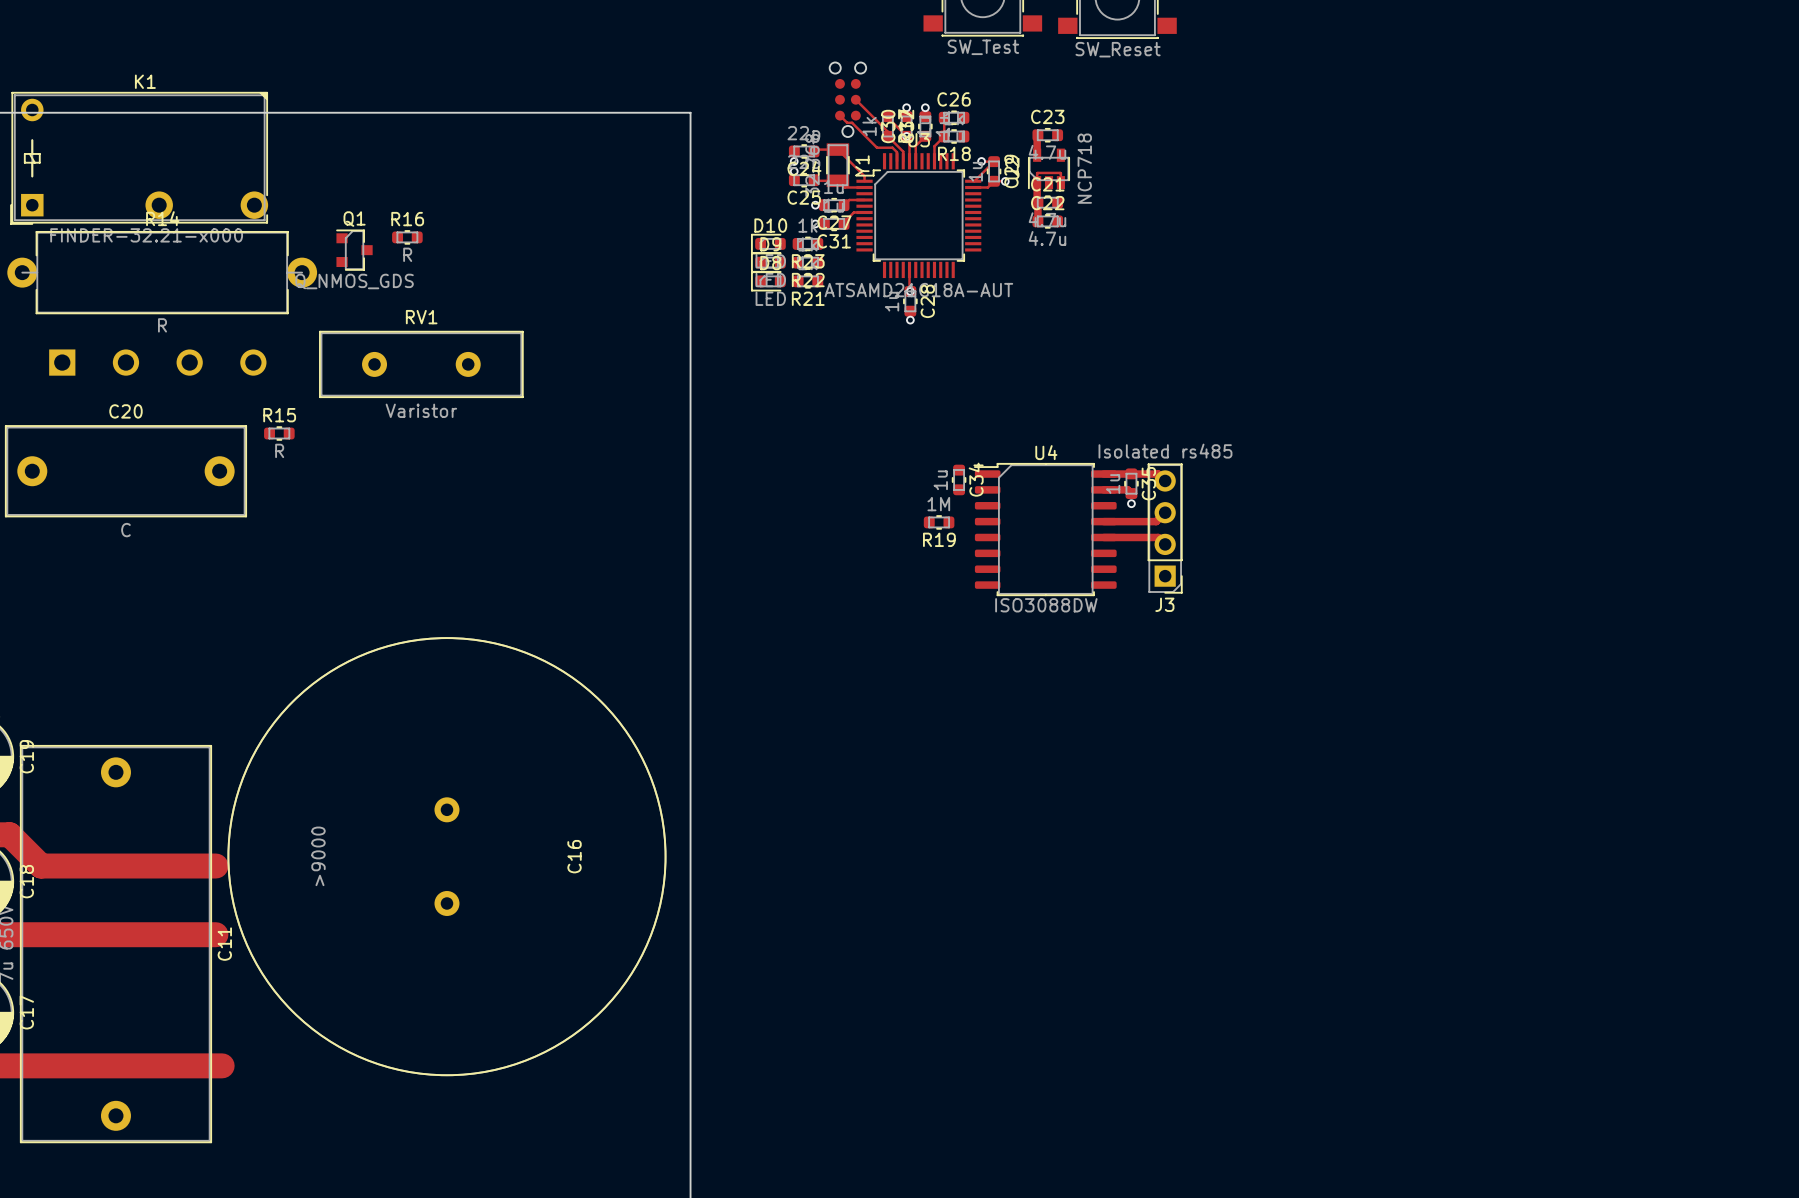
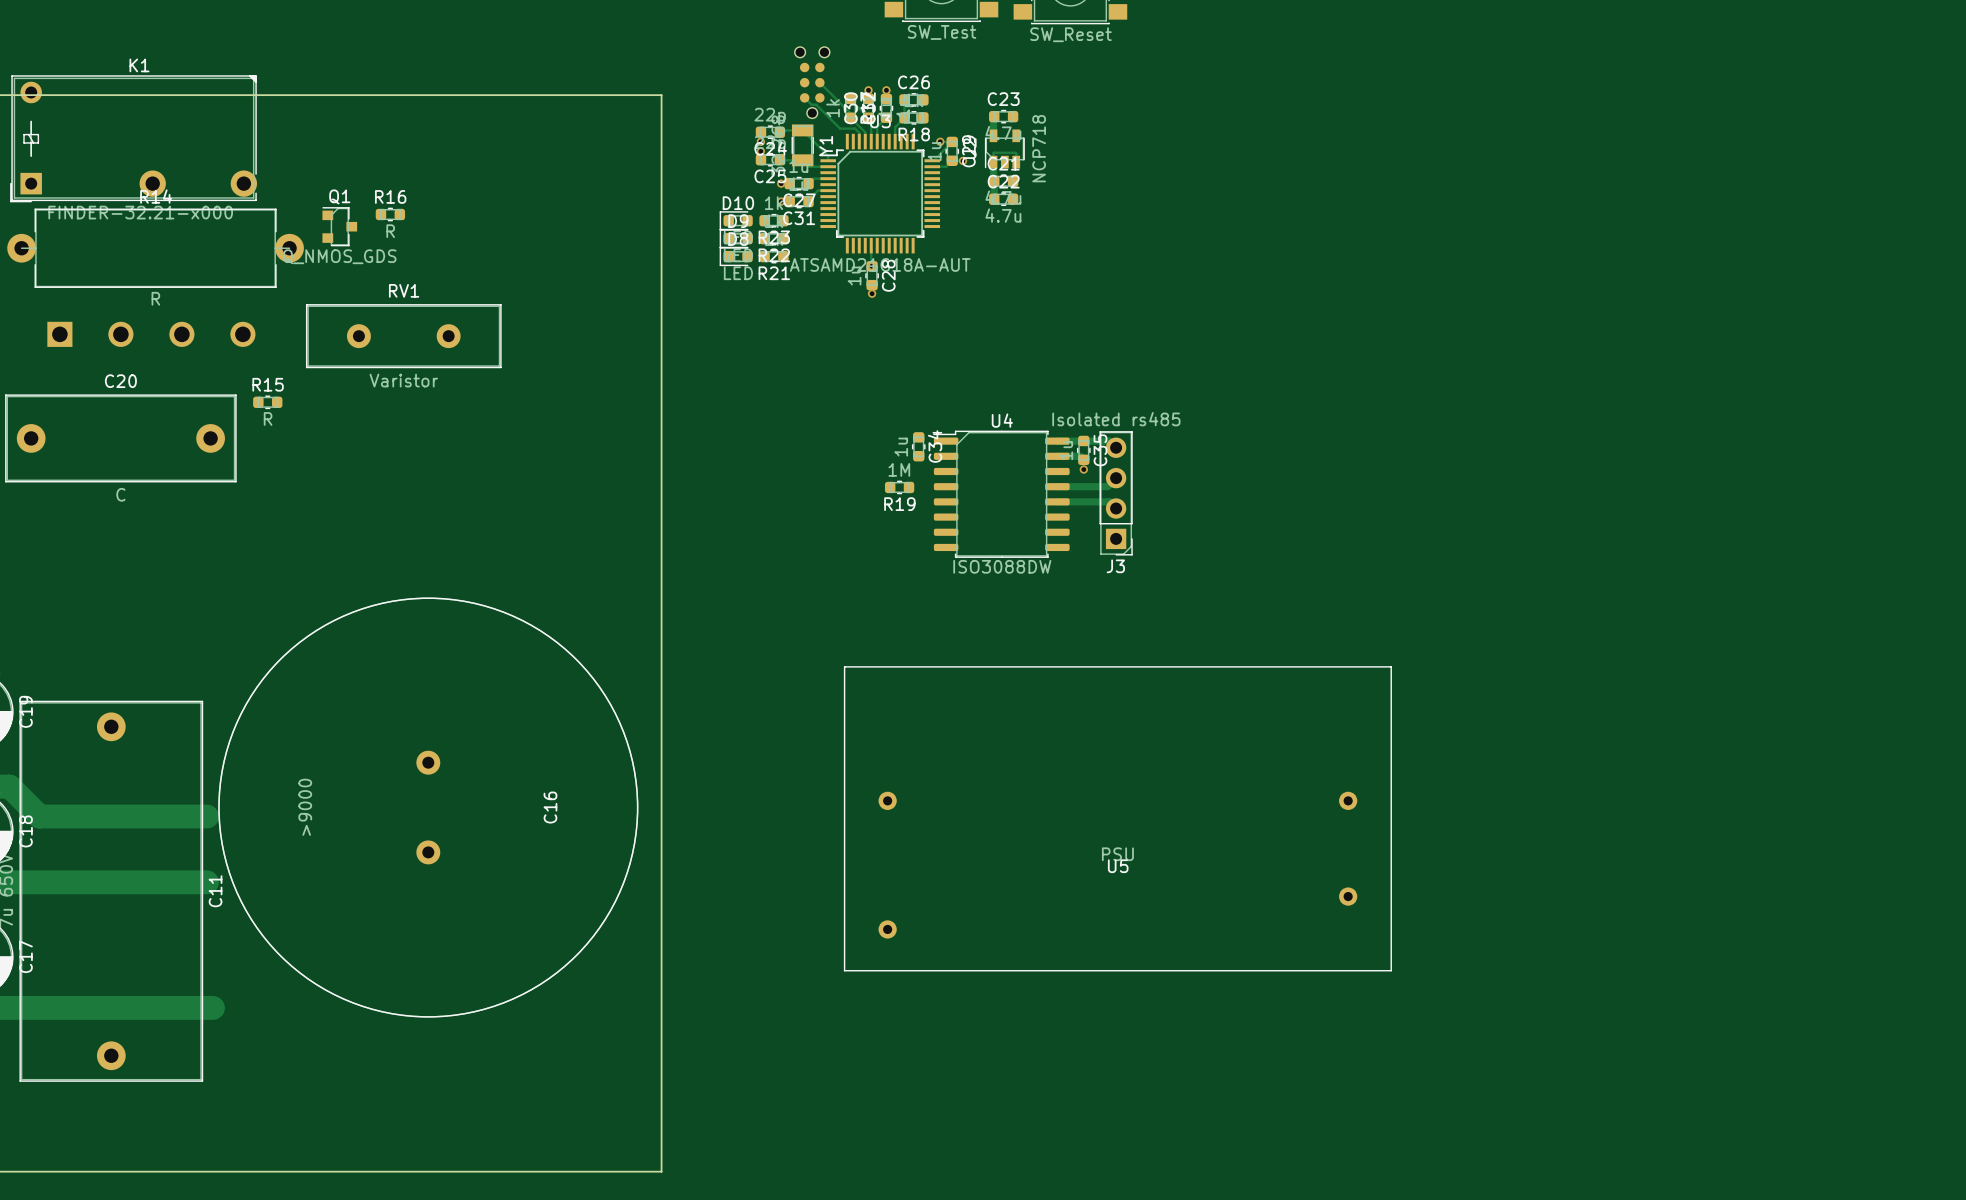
U5: none -> PSU (1117, 818)

